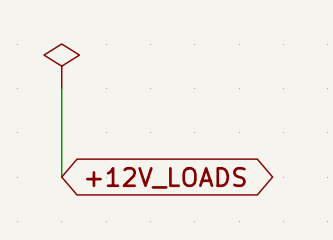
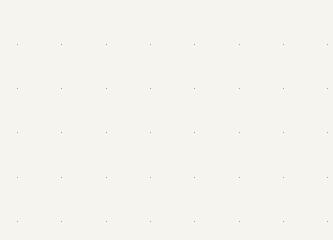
power symbol: (61, 66) -> none
wire: (61, 88) (61, 177) -> none
global label: +12V_LOADS (165, 177) -> none

